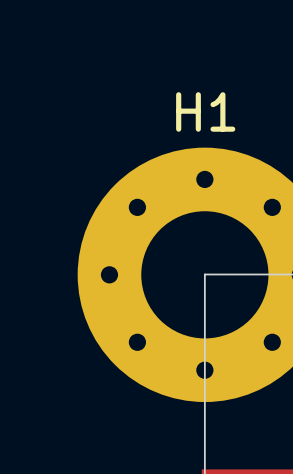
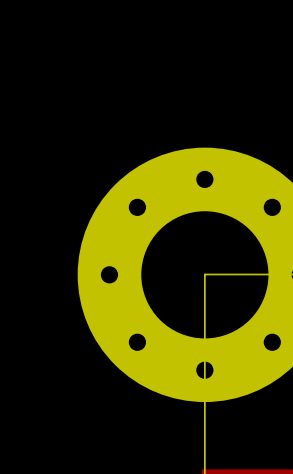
H1 name: H1 (205, 111) -> none

